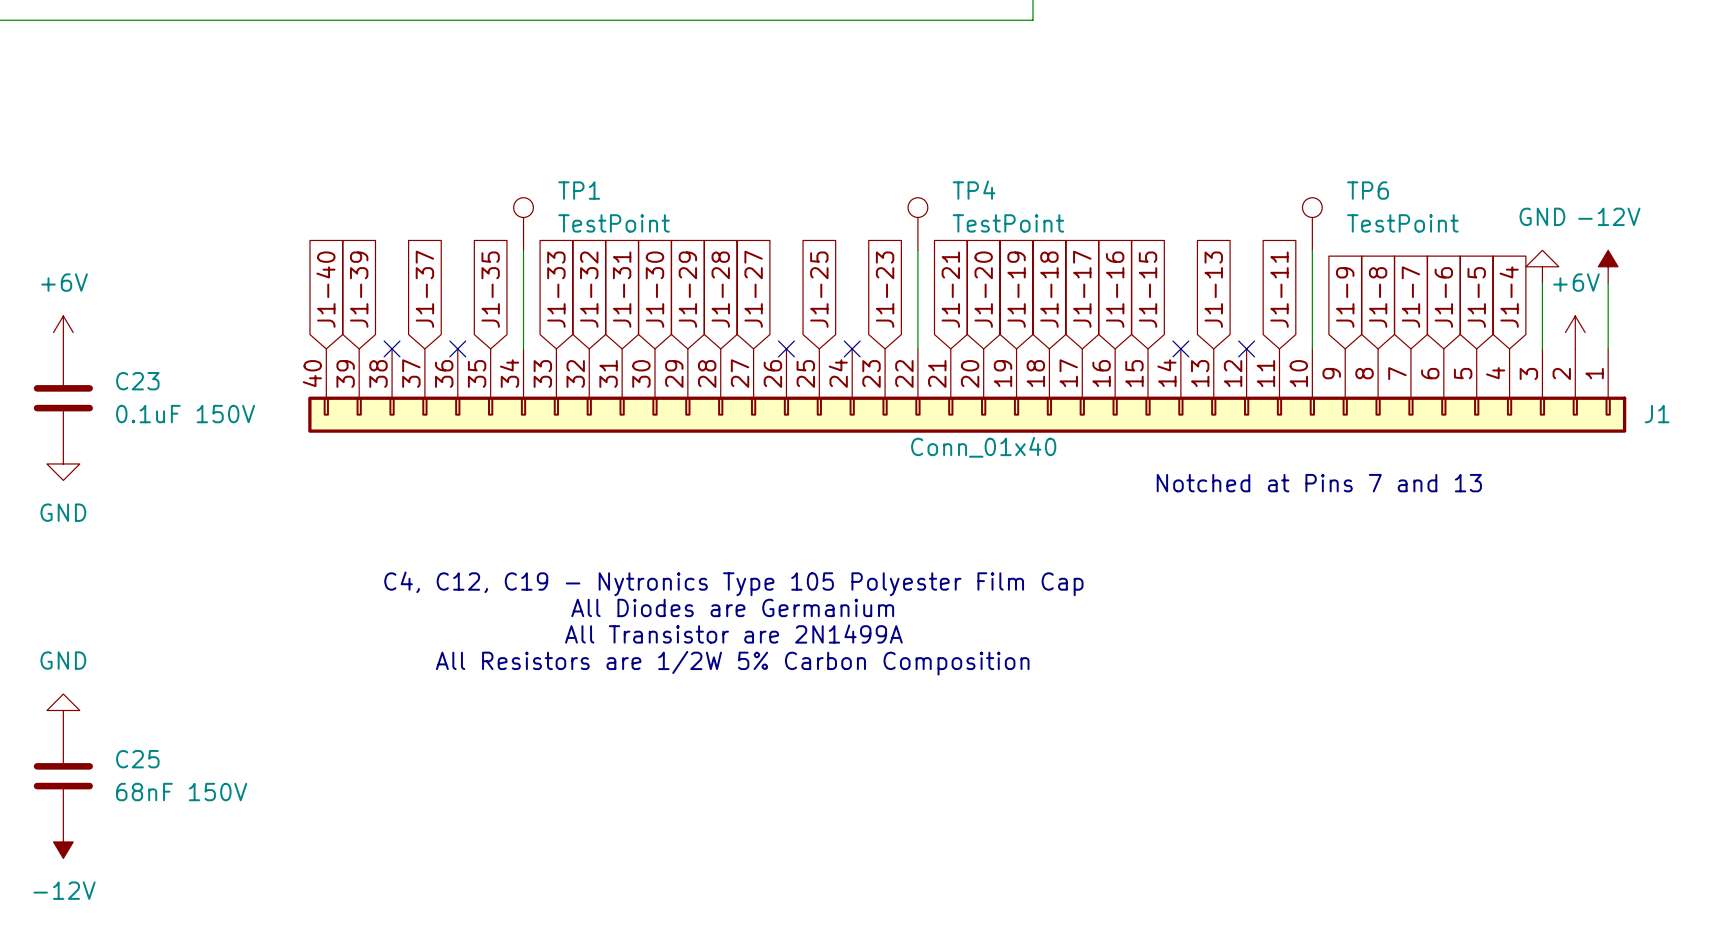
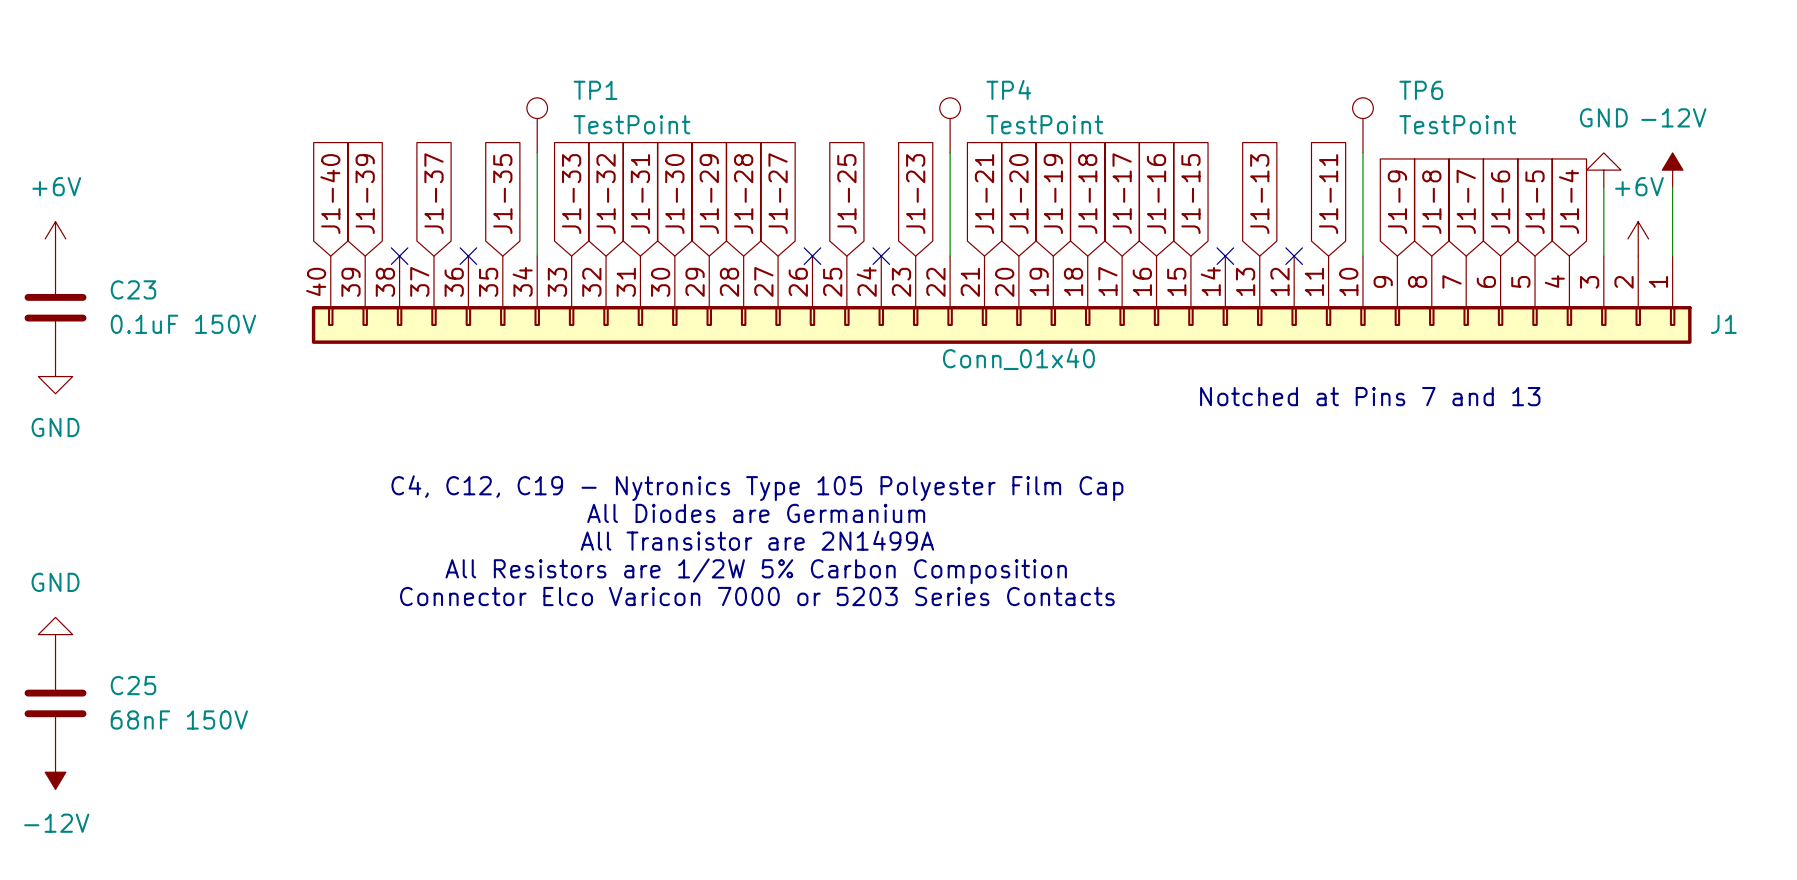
text position: C4, C12, C19 - Nytronics Type 105 Polyester Film Cap (733, 583) -> C4, C12, C19 - Nytronics Type 105 Polyester Film Cap (757, 488)
text position: All Diodes are Germanium (732, 607) -> All Diodes are Germanium (756, 513)
text position: All Transistor are 2N1499A (733, 634) -> All Transistor are 2N1499A (757, 540)
text position: All Resistors are 1/2W 5% Carbon Composition (732, 663) -> All Resistors are 1/2W 5% Carbon Composition (756, 571)
text: none -> Connector Elco Varicon 7000 or 5203 Series Contacts (757, 596)

